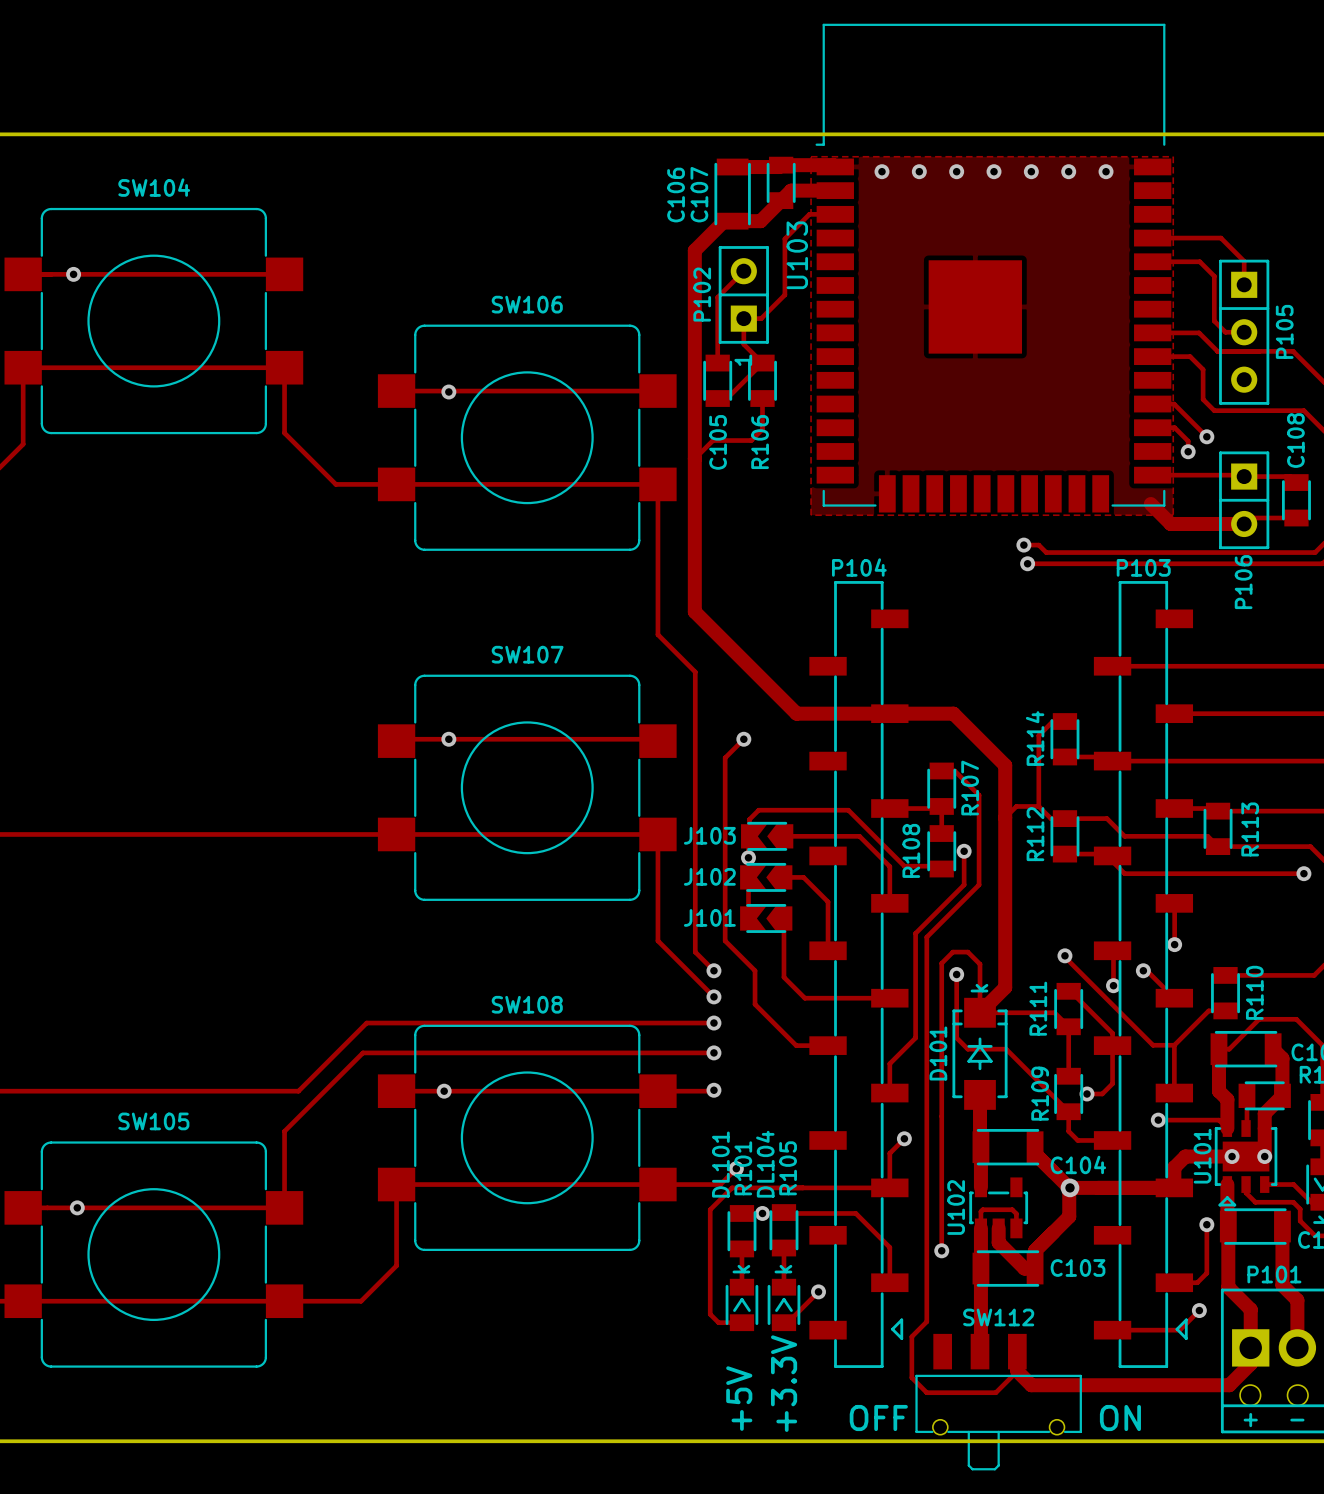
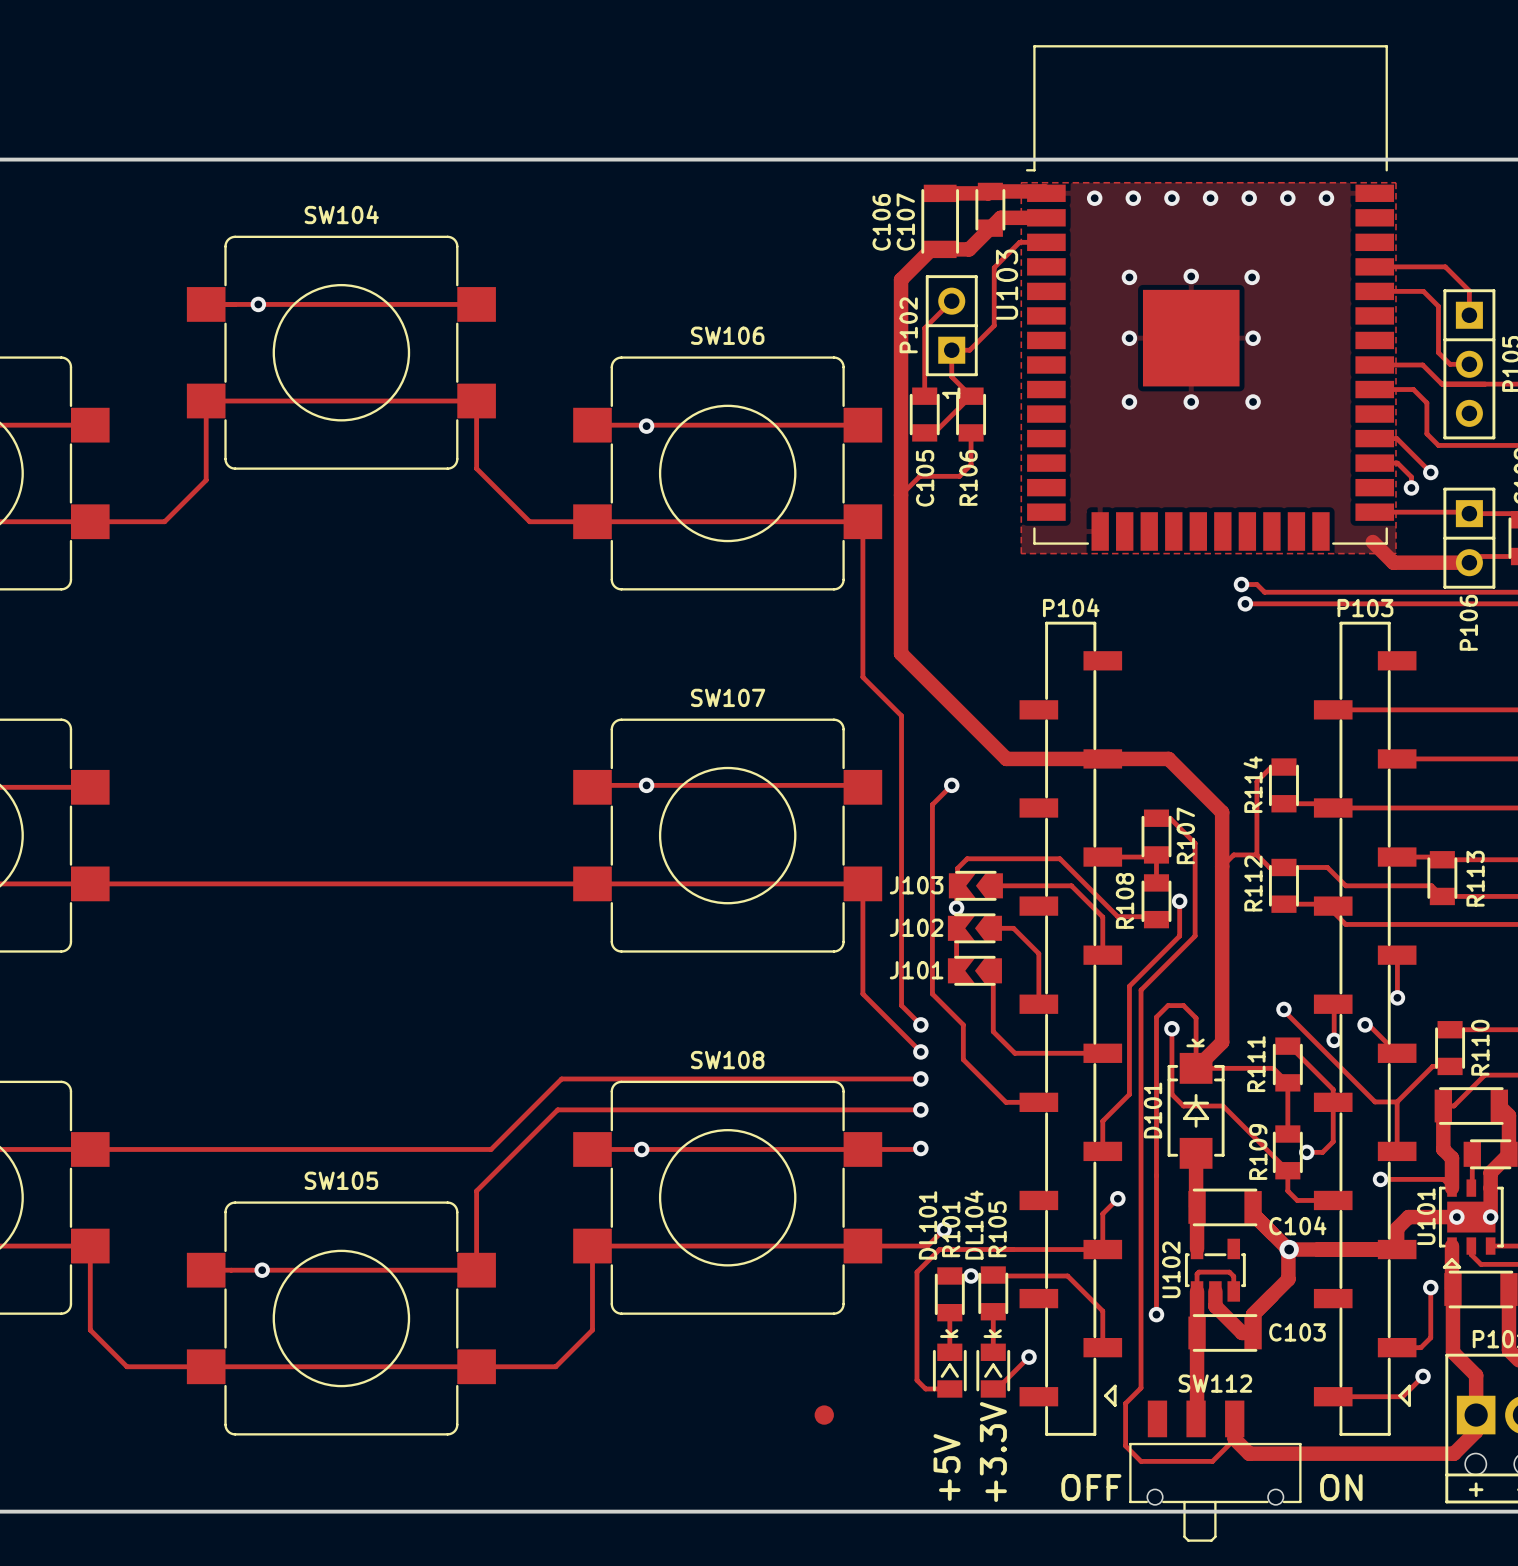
via: none -> (1191, 276)
via: none -> (1129, 277)
via: none -> (1252, 277)
via: none -> (1129, 338)
via: none -> (1253, 338)
via: none -> (1129, 401)
via: none -> (1191, 401)
via: none -> (1253, 401)
part: none -> (824, 1415)

